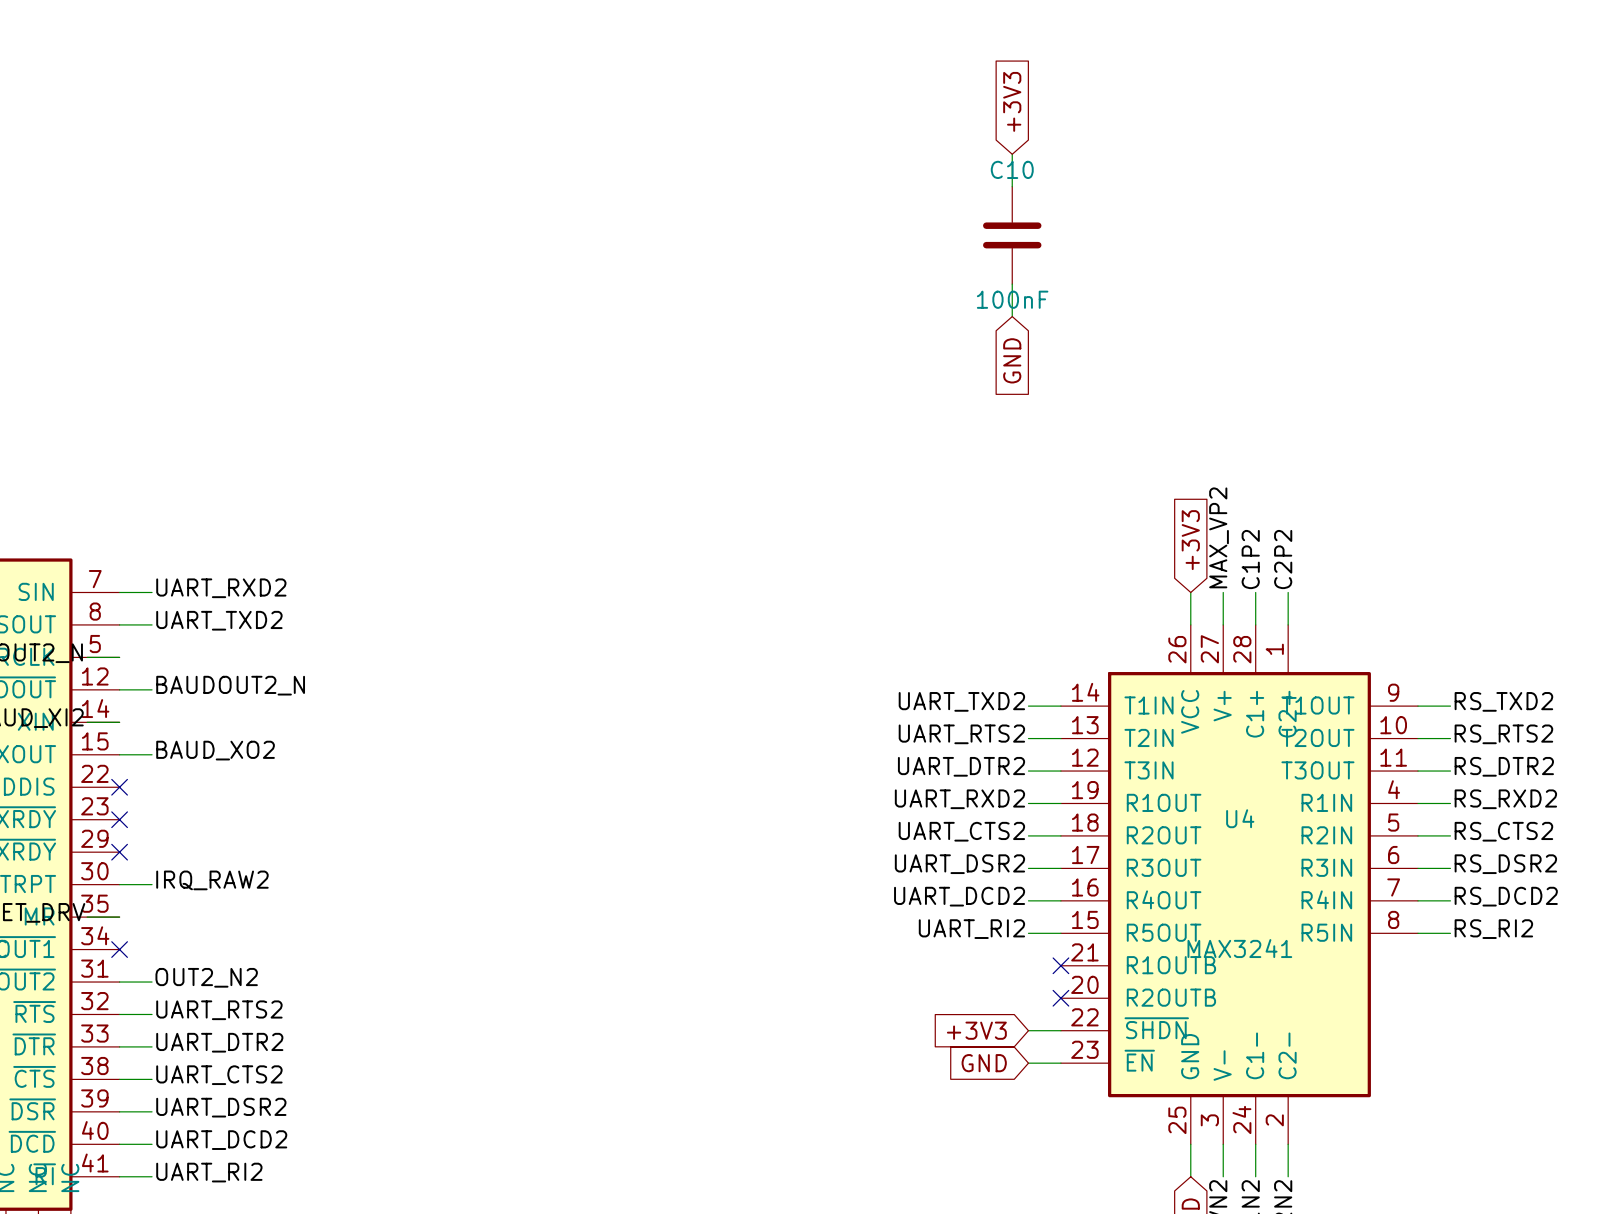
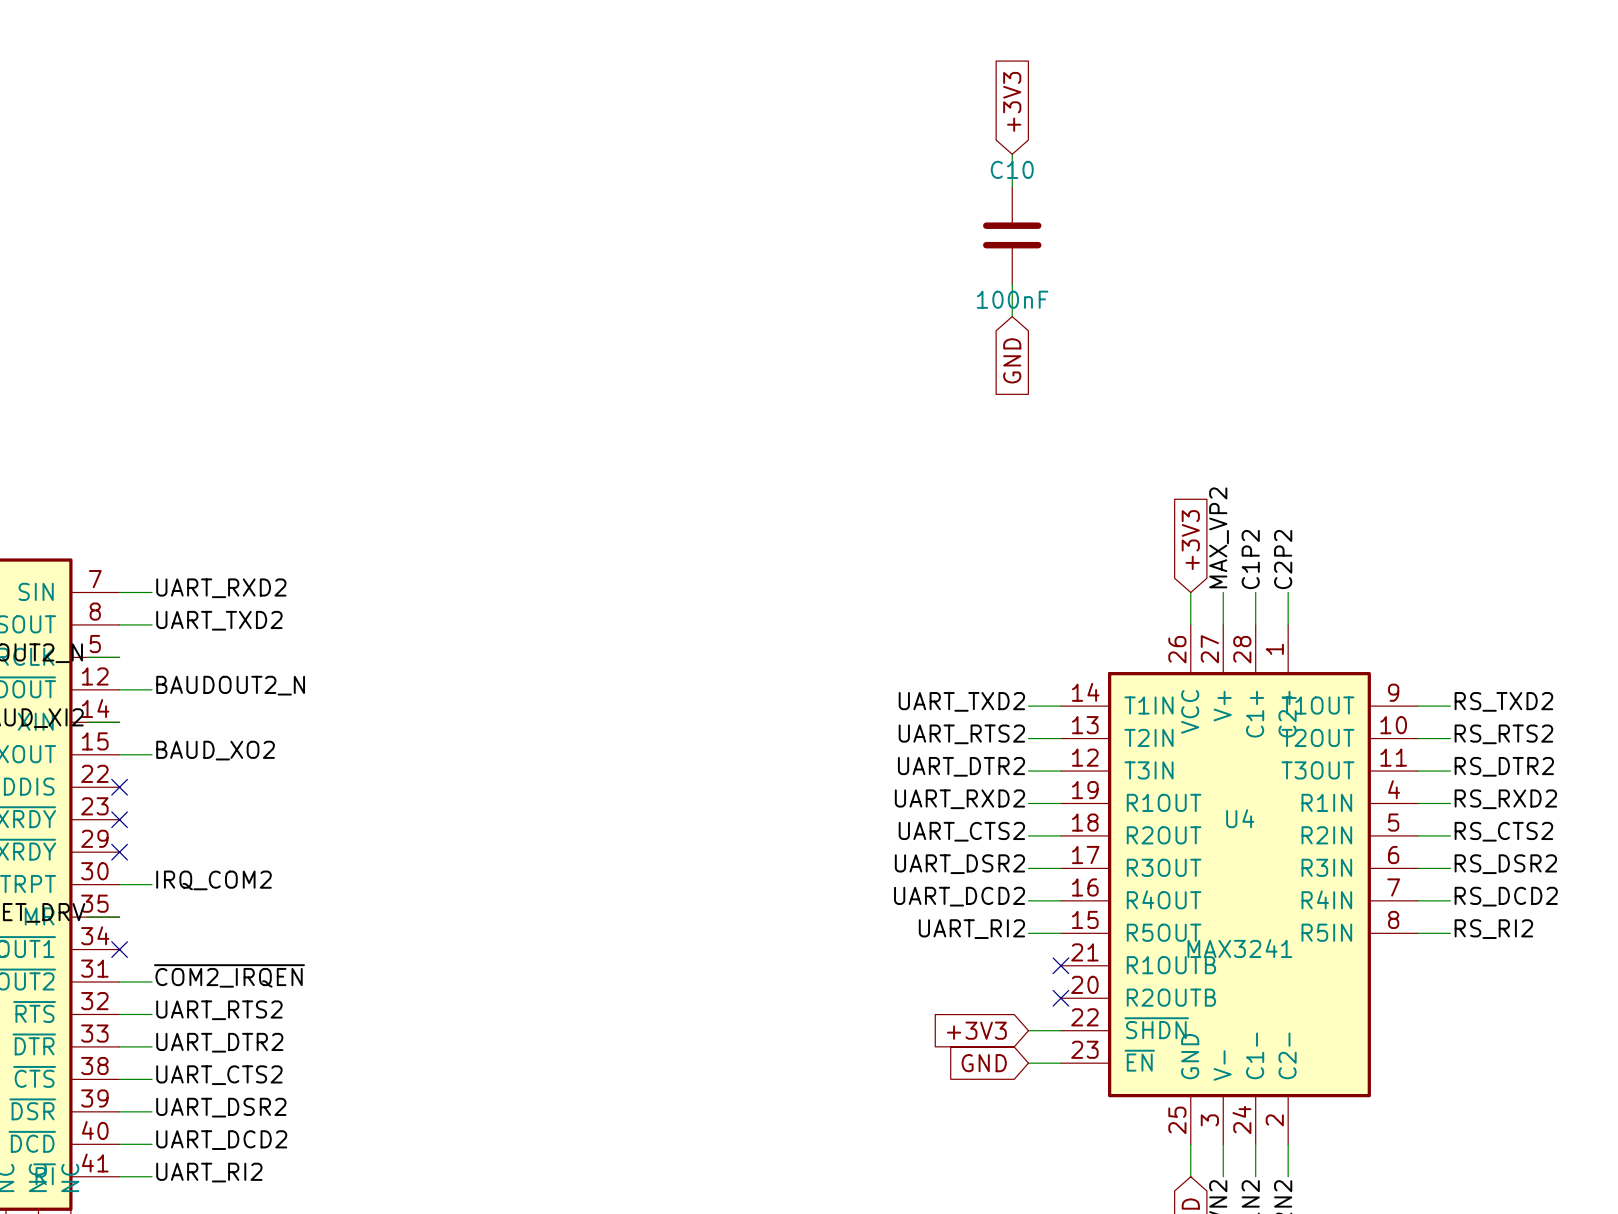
label: IRQ_RAW2 (212, 880) -> IRQ_COM2 (214, 880)
label: OUT2_N2 (206, 977) -> ~{COM2_IRQEN} (229, 975)

